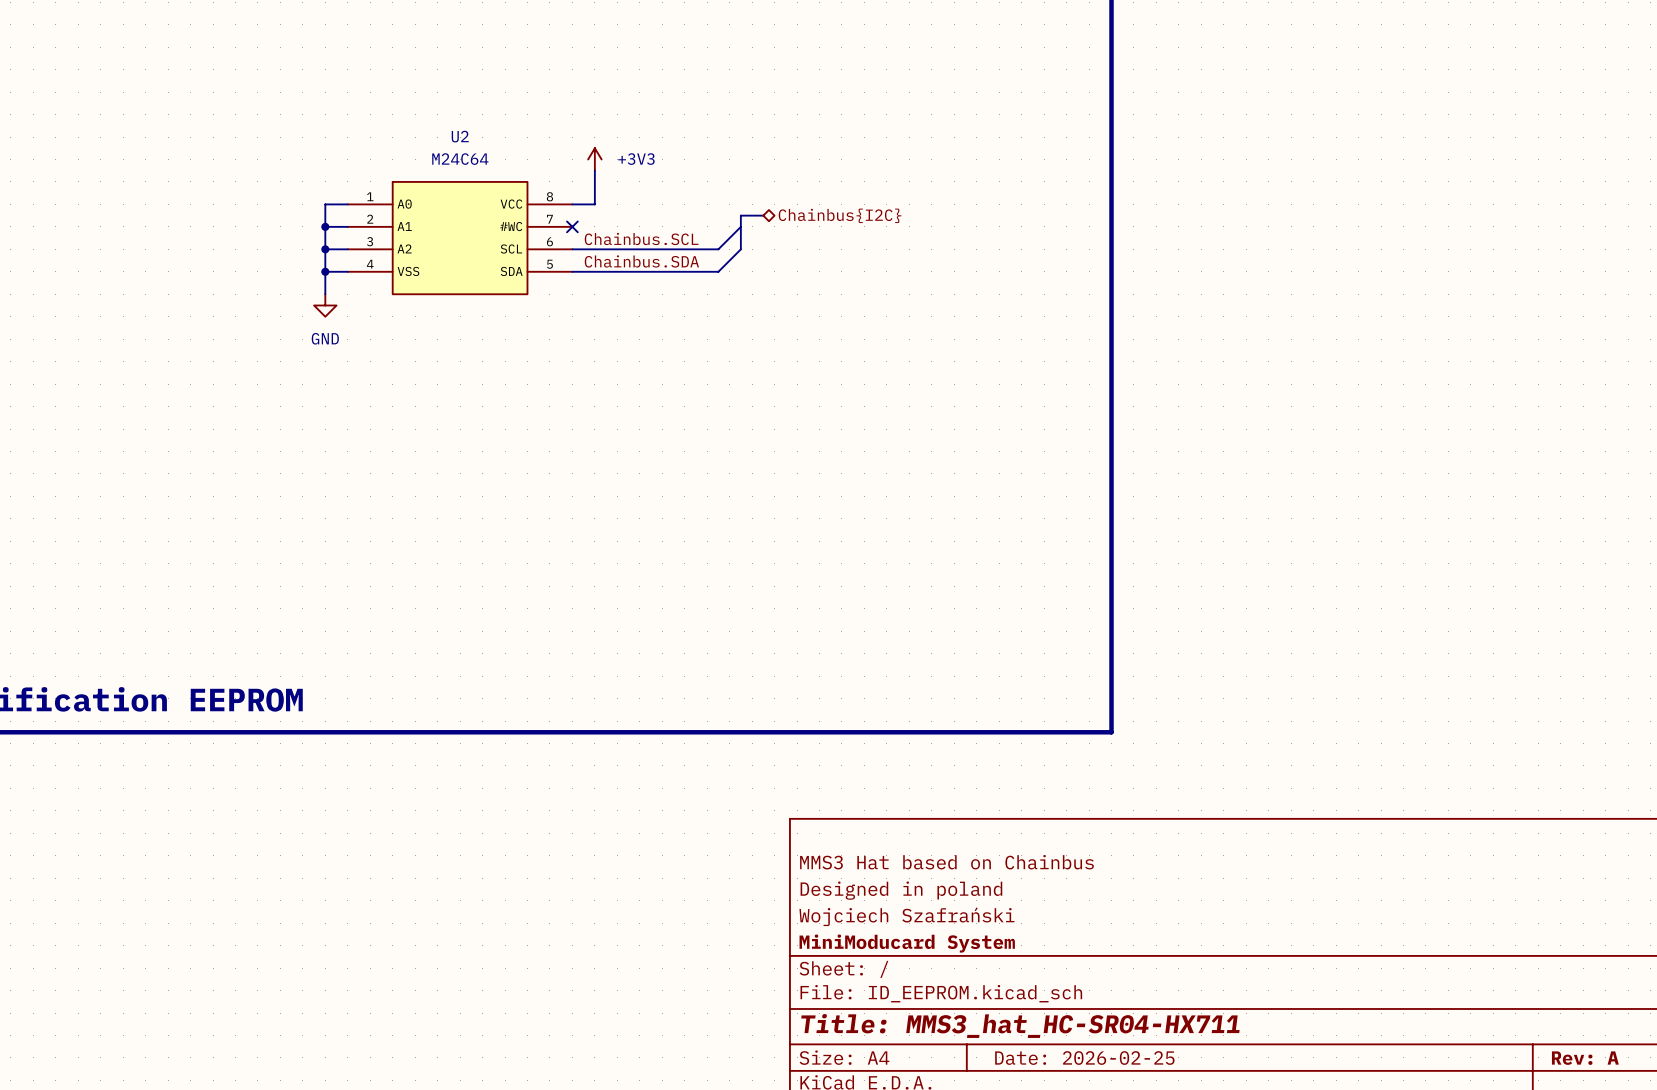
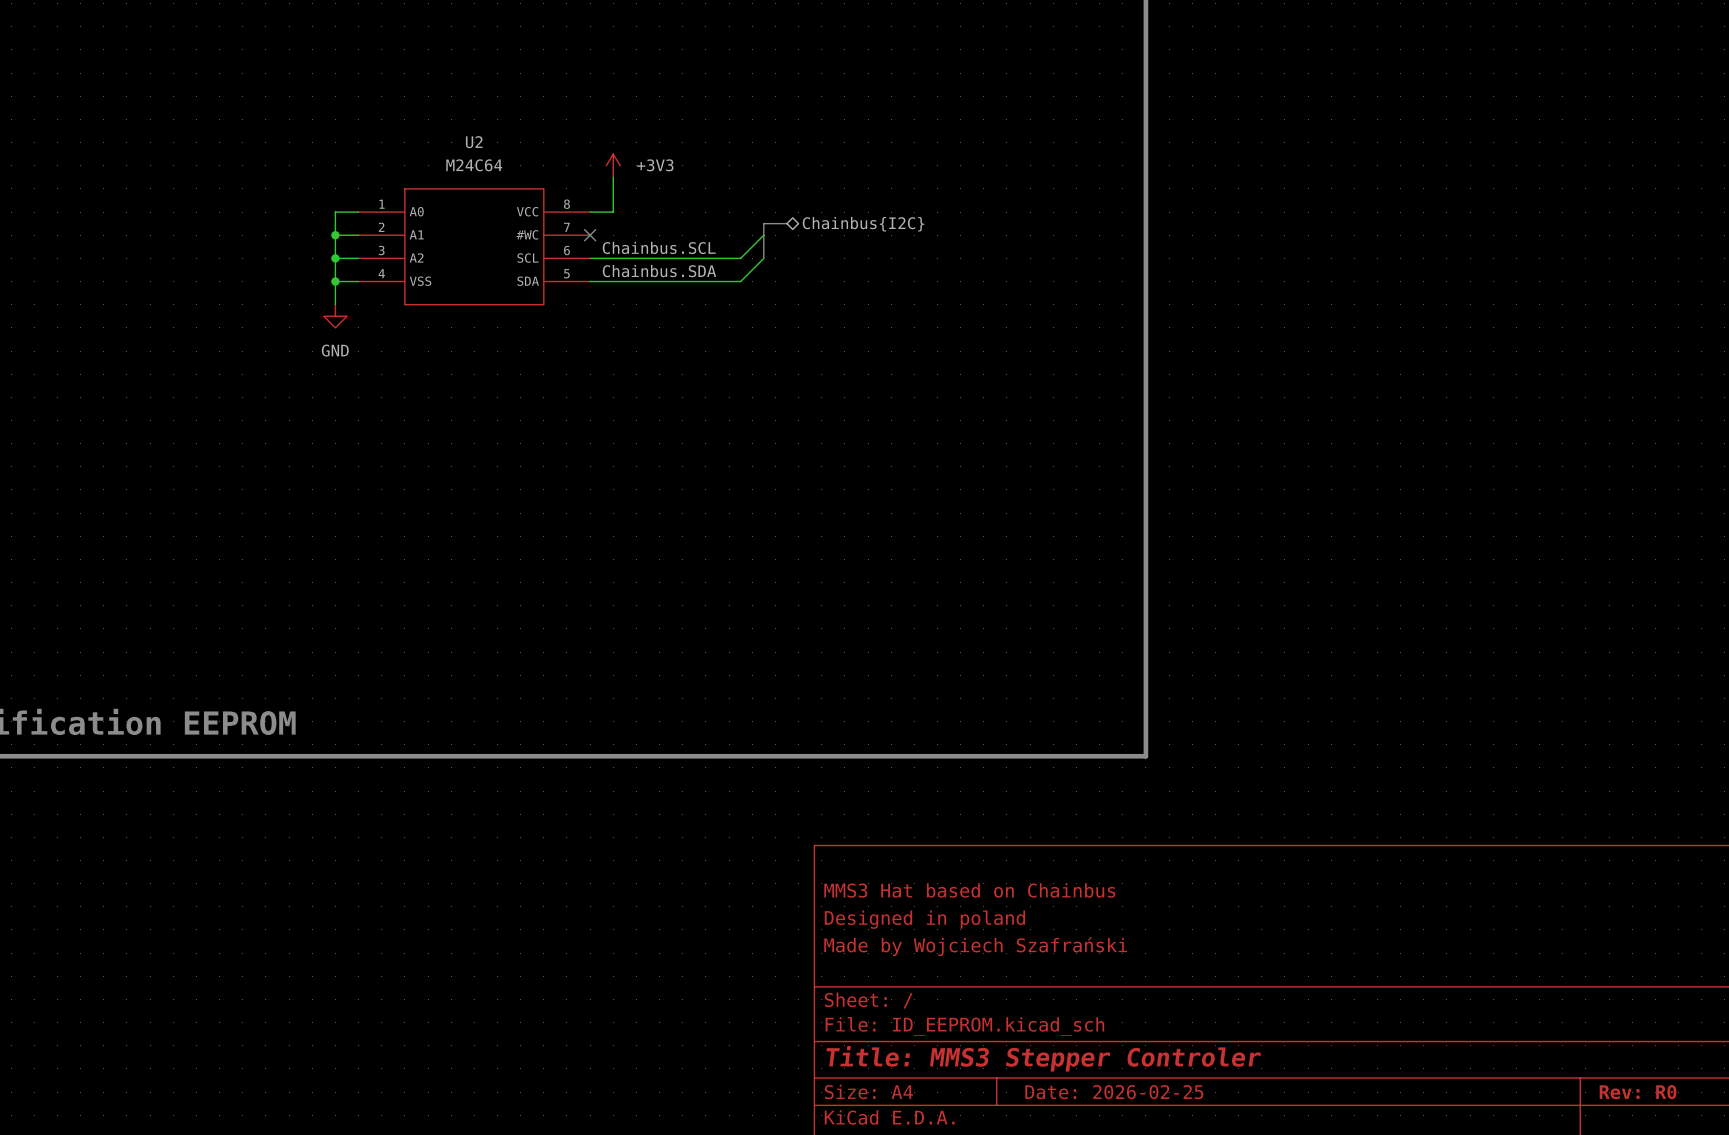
title block: Wojciech Szafrański (906, 916) -> Made by Wojciech Szafrański (975, 946)
title block: MiniModucard System (907, 943) -> none
title block: Title: MMS3_hat_HC-SR04-HX711 (1020, 1026) -> Title: MMS3 Stepper Controler (1043, 1058)
title block: Rev: A (1585, 1058) -> Rev: R0 (1638, 1092)

